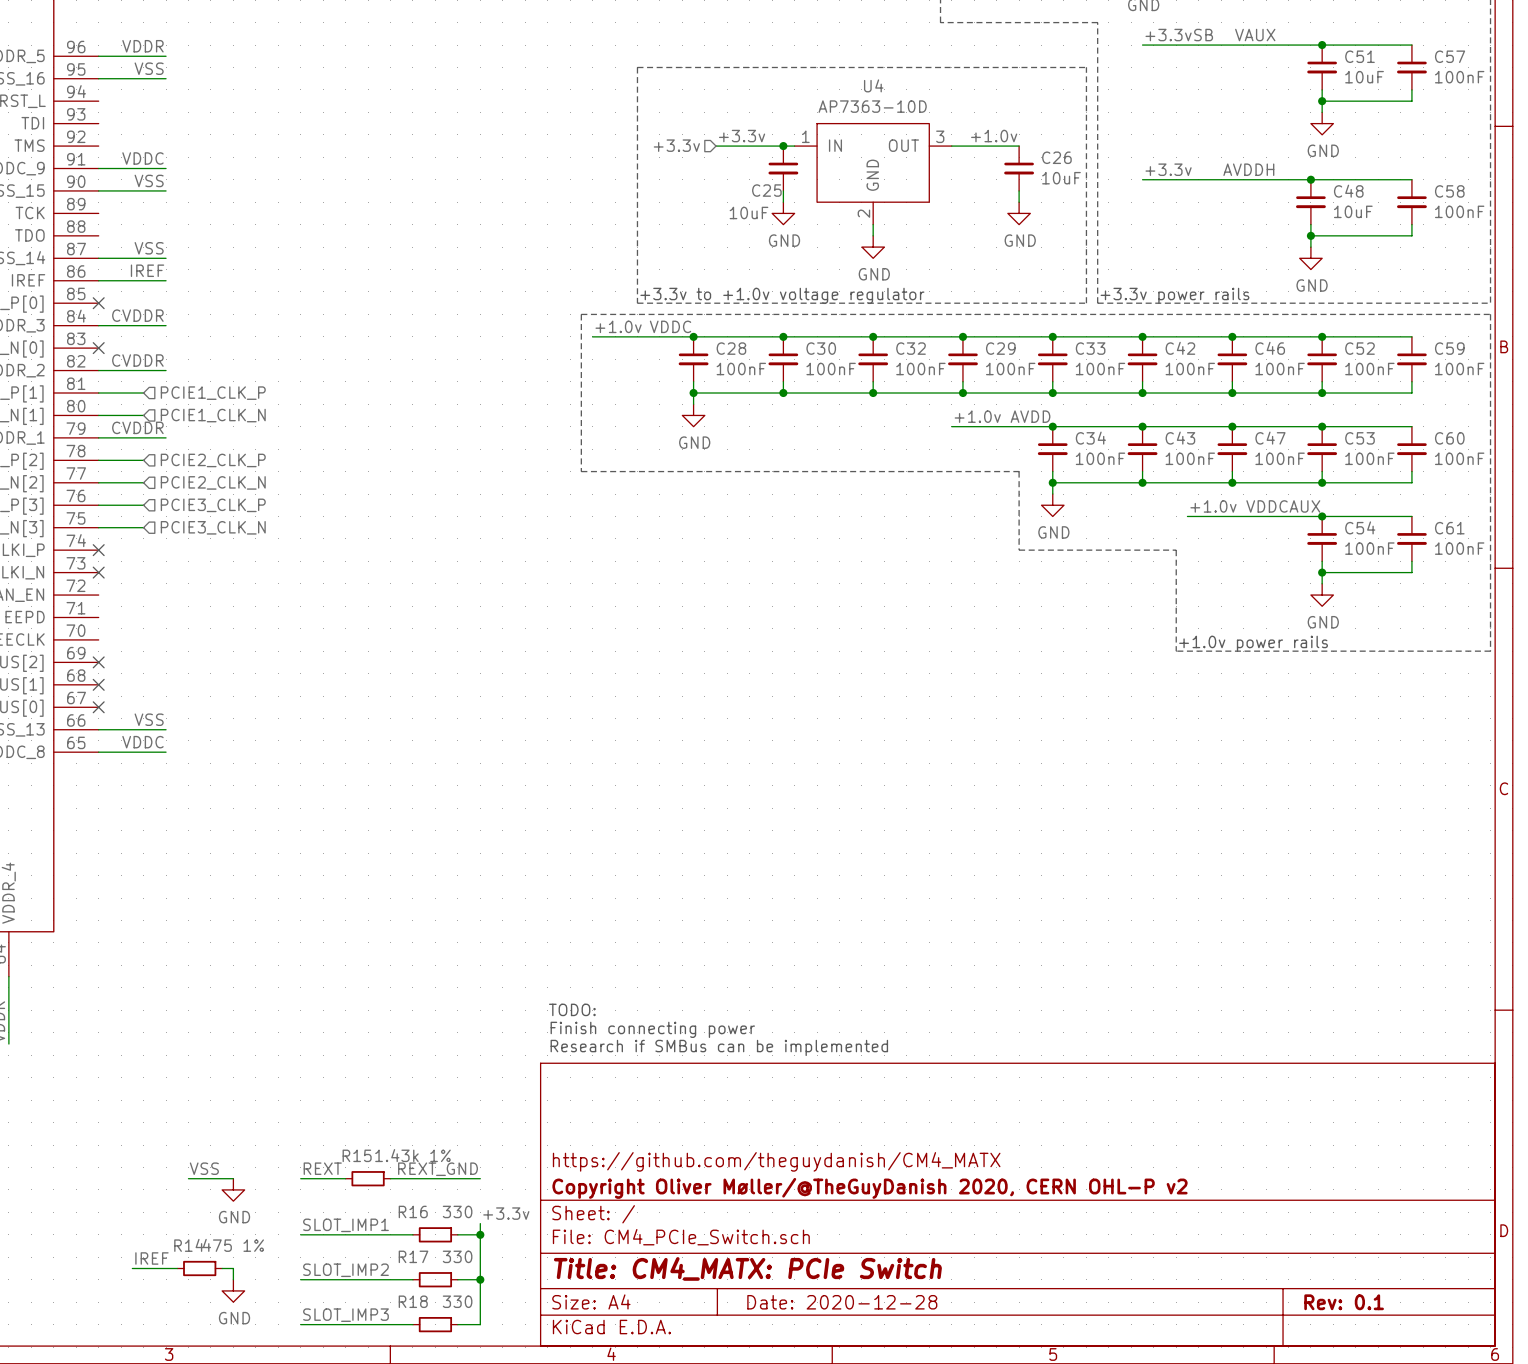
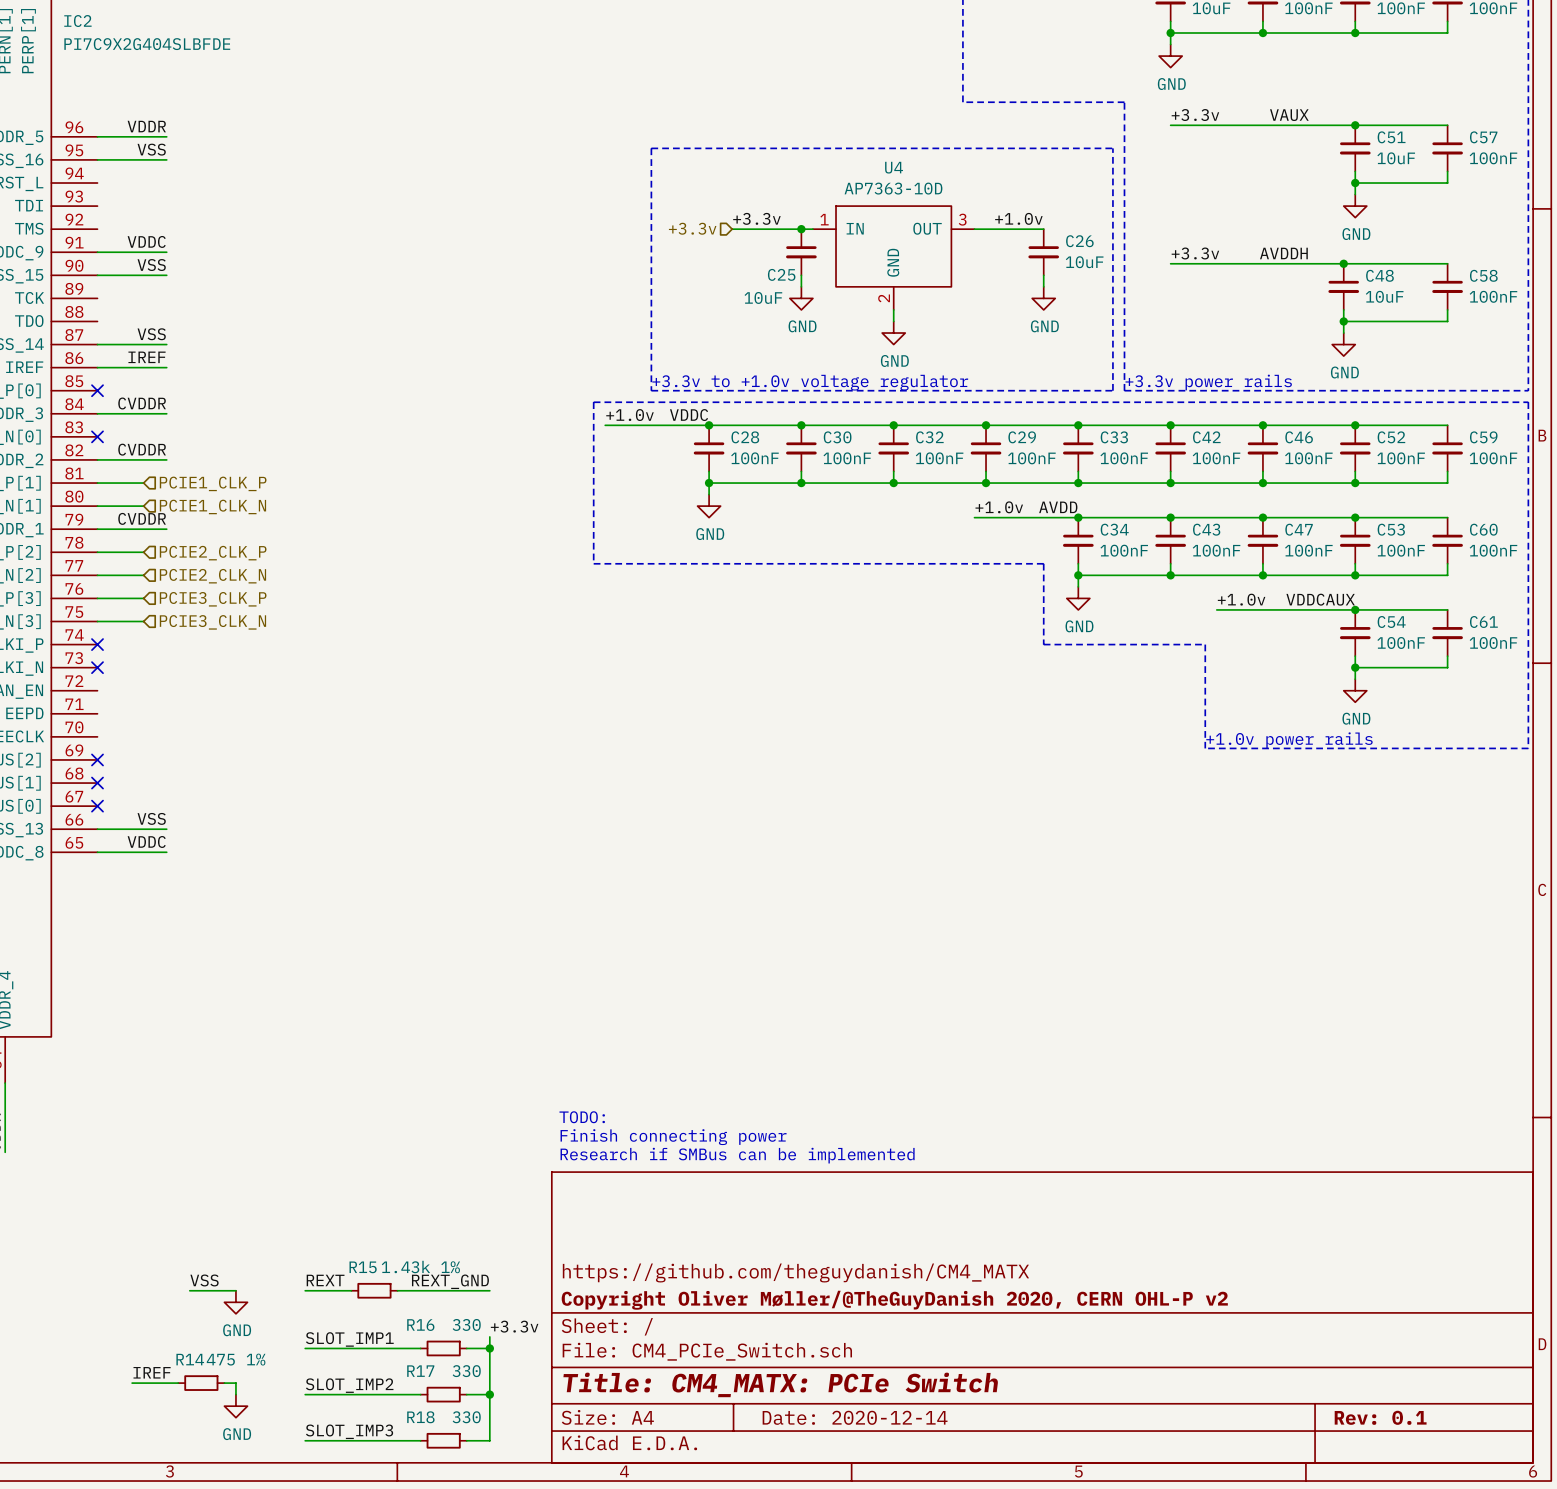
label: +3.3vSB (1179, 35) -> +3.3v (1195, 115)
title block: Date: 2020-12-28 (842, 1302) -> Date: 2020-12-14 (855, 1417)

